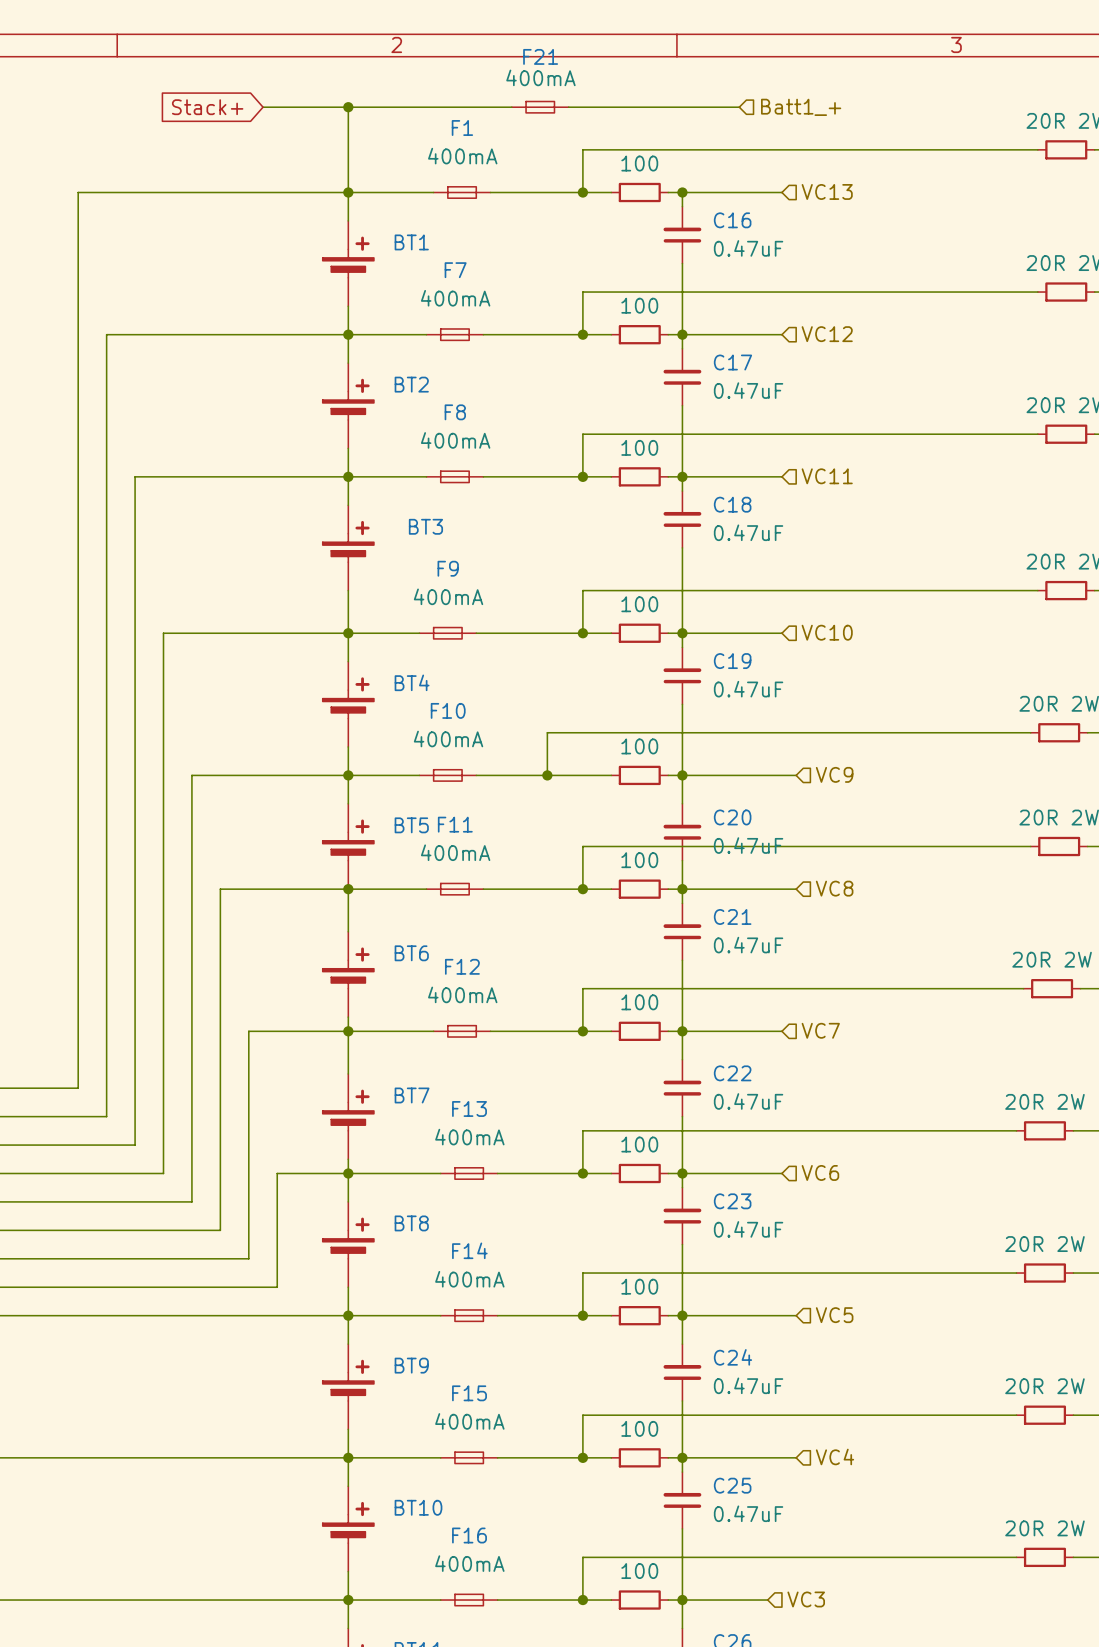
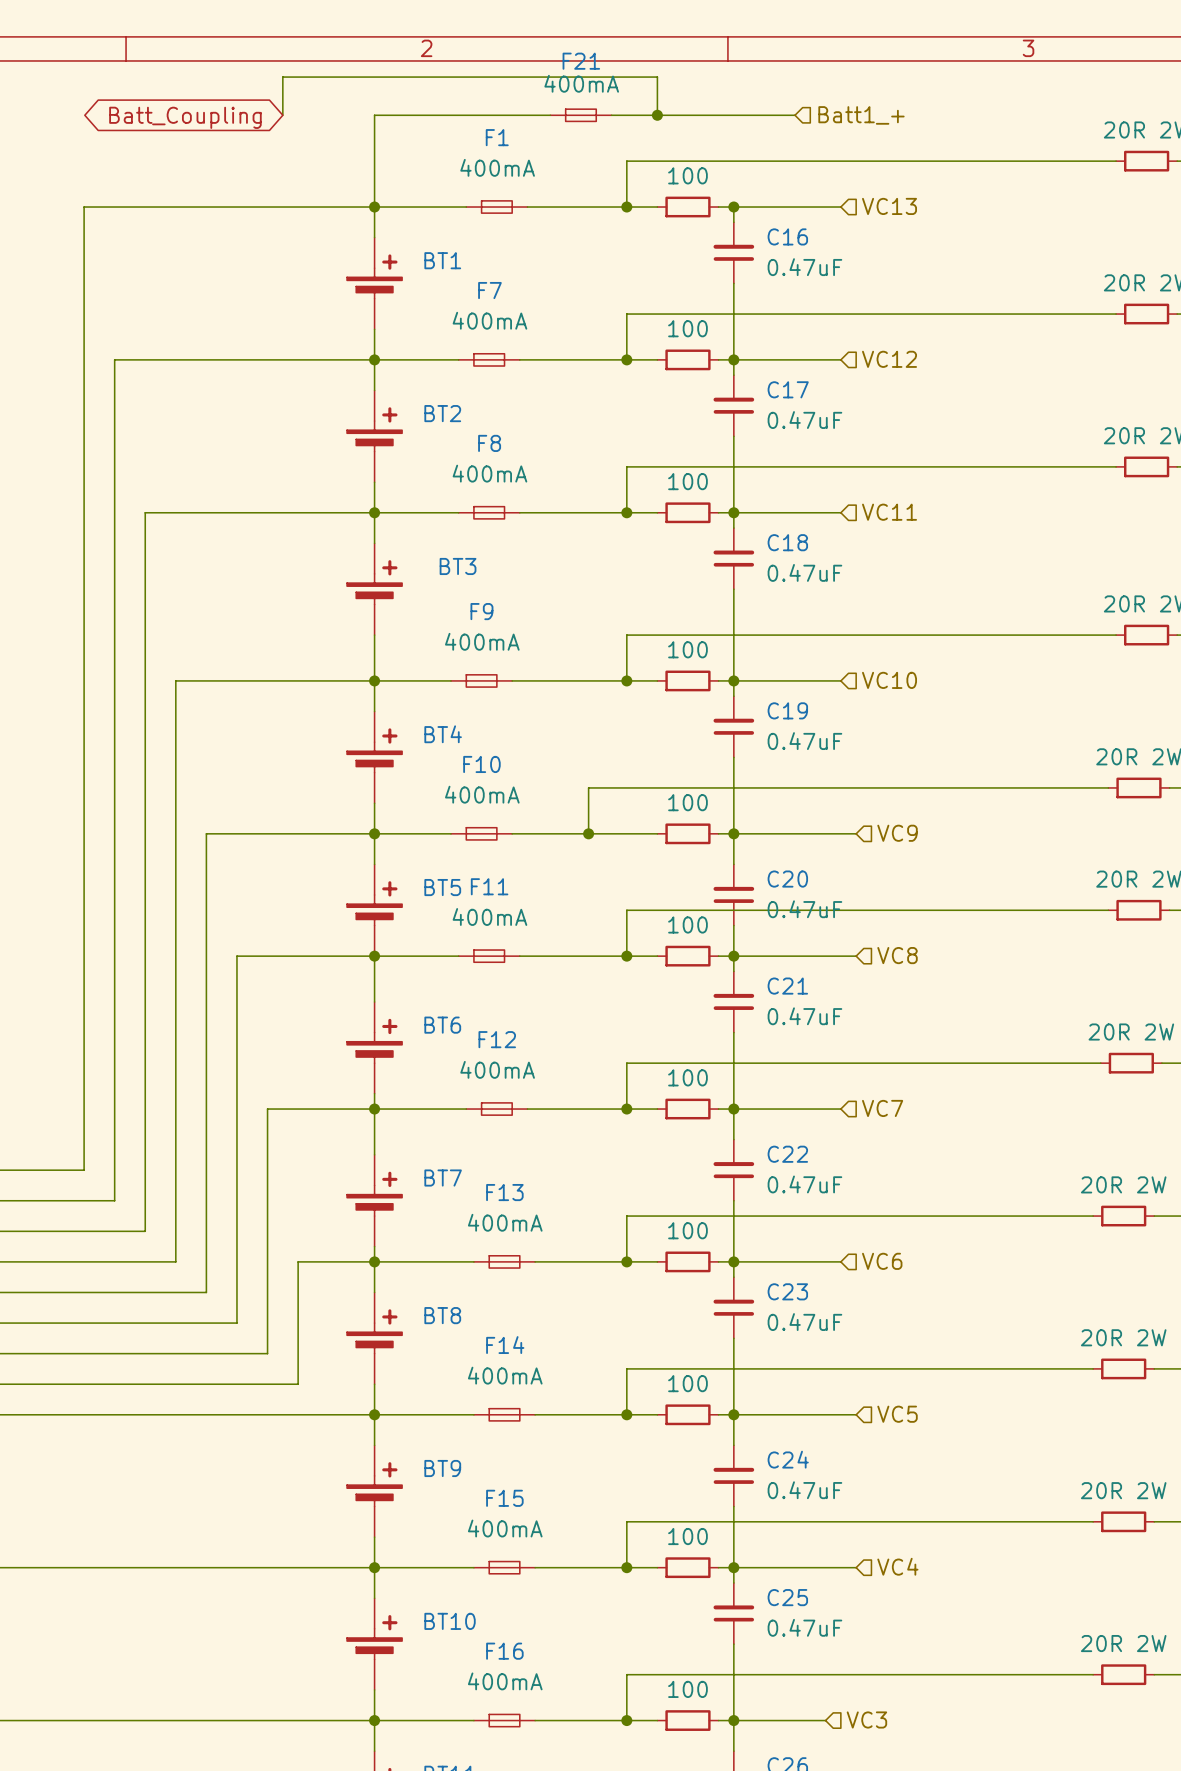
global label shape: input (207, 107) -> bidirectional (185, 117)
global label: Stack+ (207, 107) -> Batt_Coupling (185, 117)
wire: (263, 107) (348, 107) -> (282, 115) (282, 77) (657, 77) (657, 115)
junction: (348, 107) -> none
junction: none -> (657, 115)

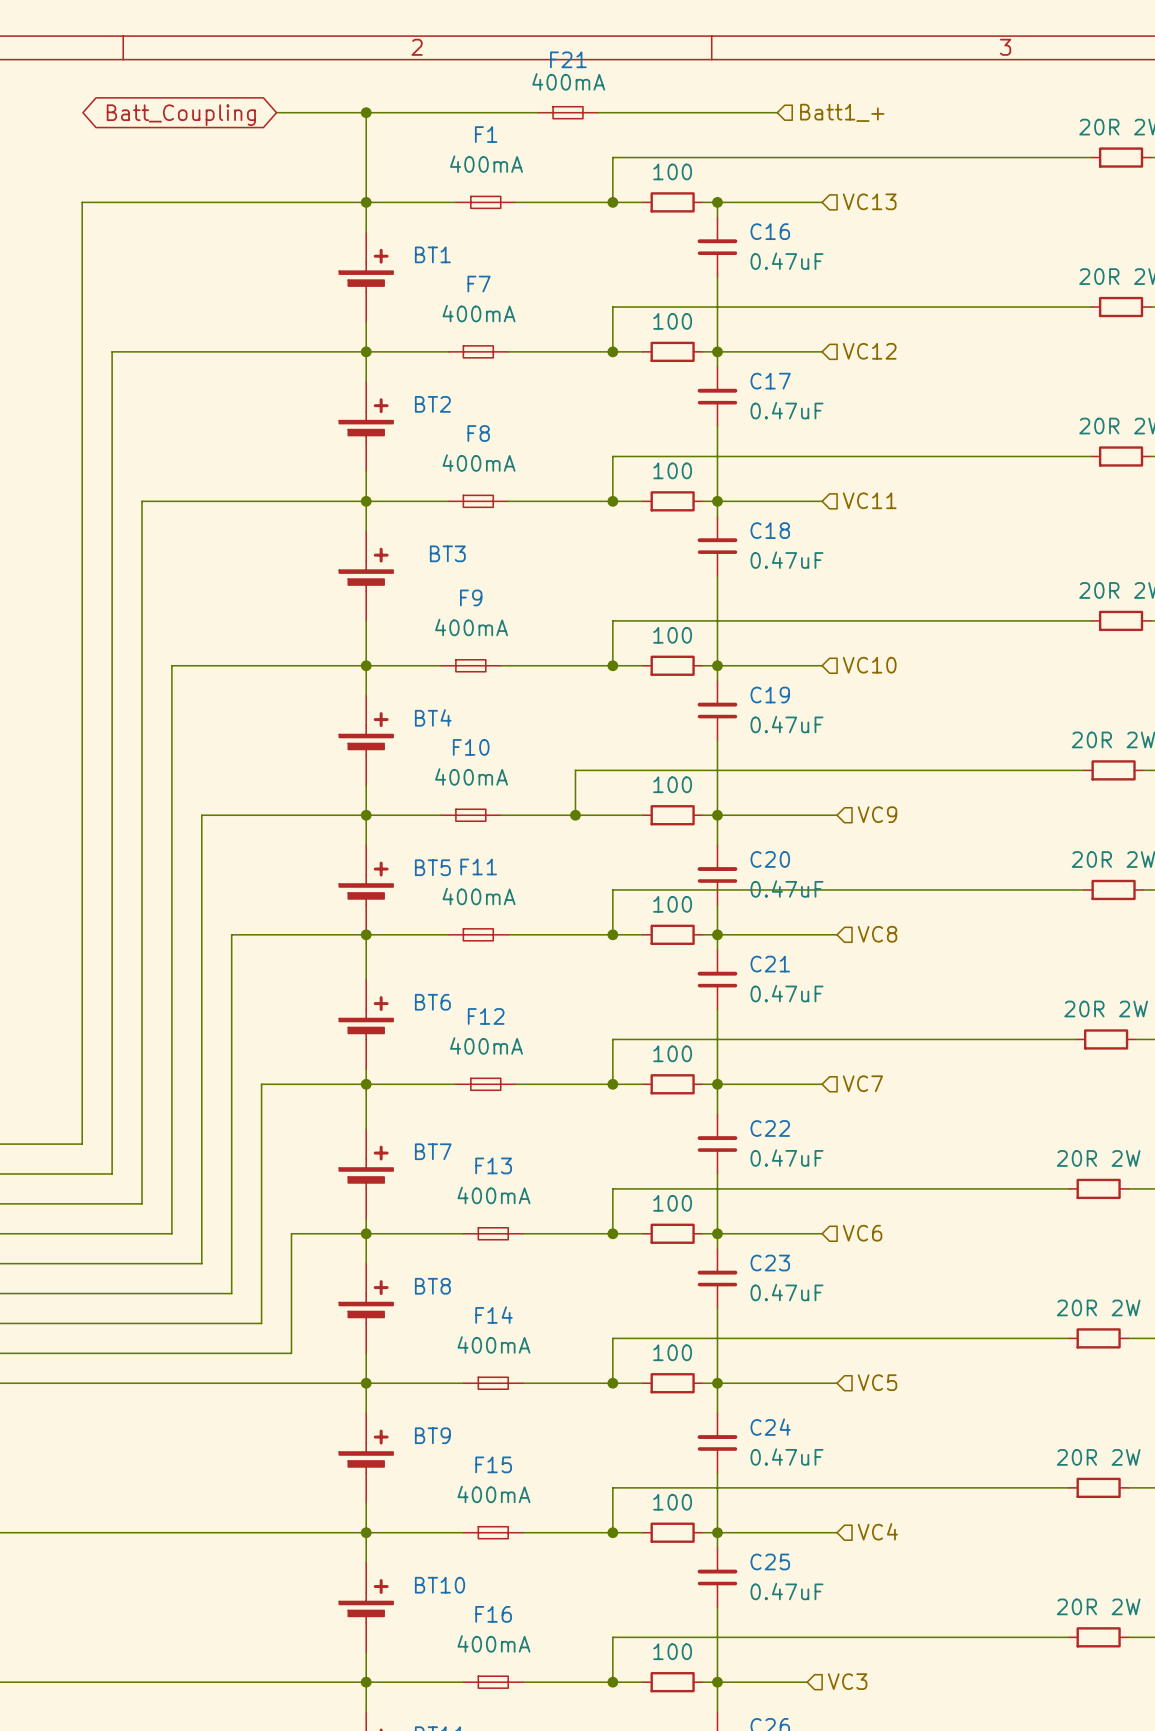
wire: (282, 115) (282, 77) (657, 77) (657, 115) -> (276, 112) (366, 112)
junction: none -> (366, 112)
junction: (657, 115) -> none

